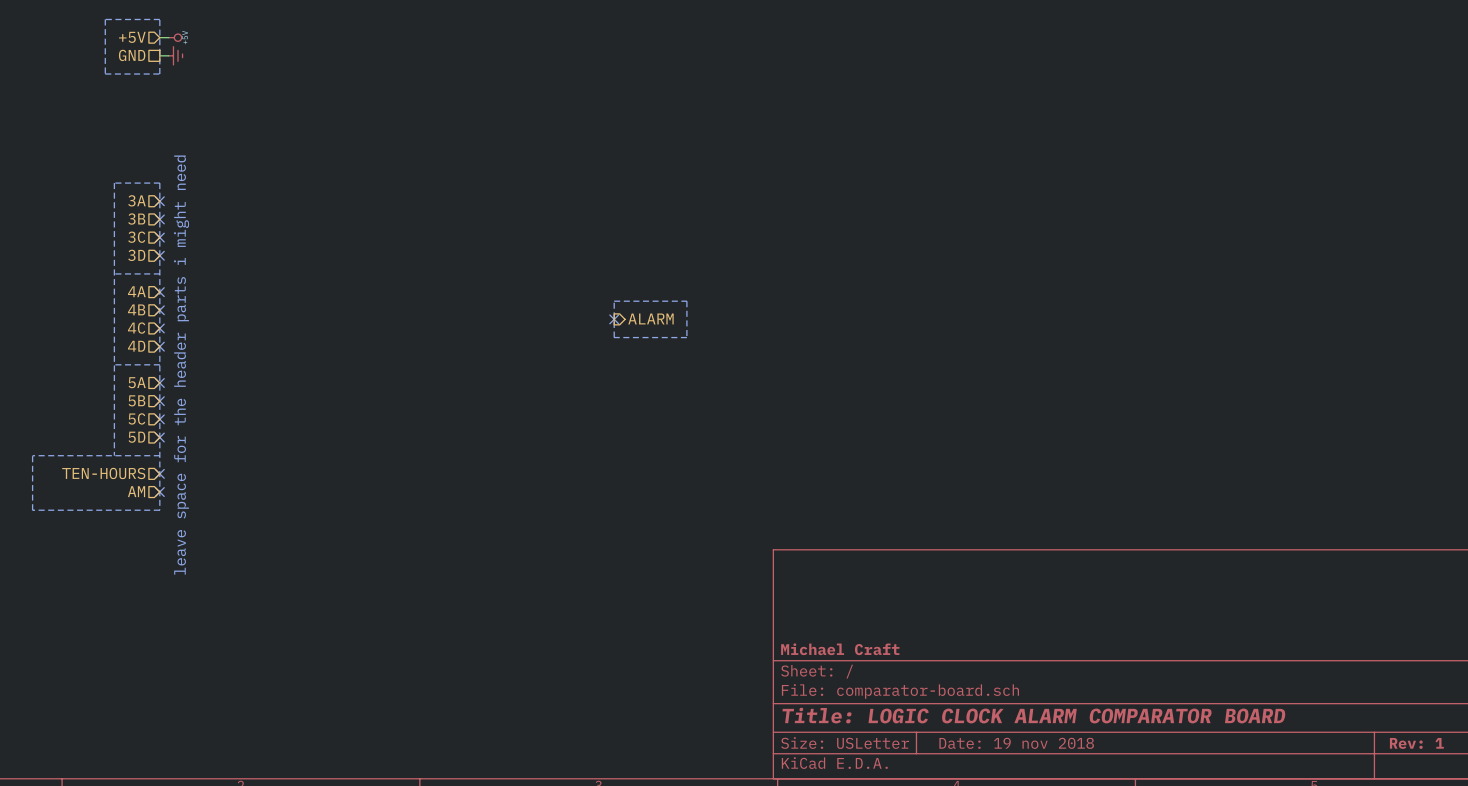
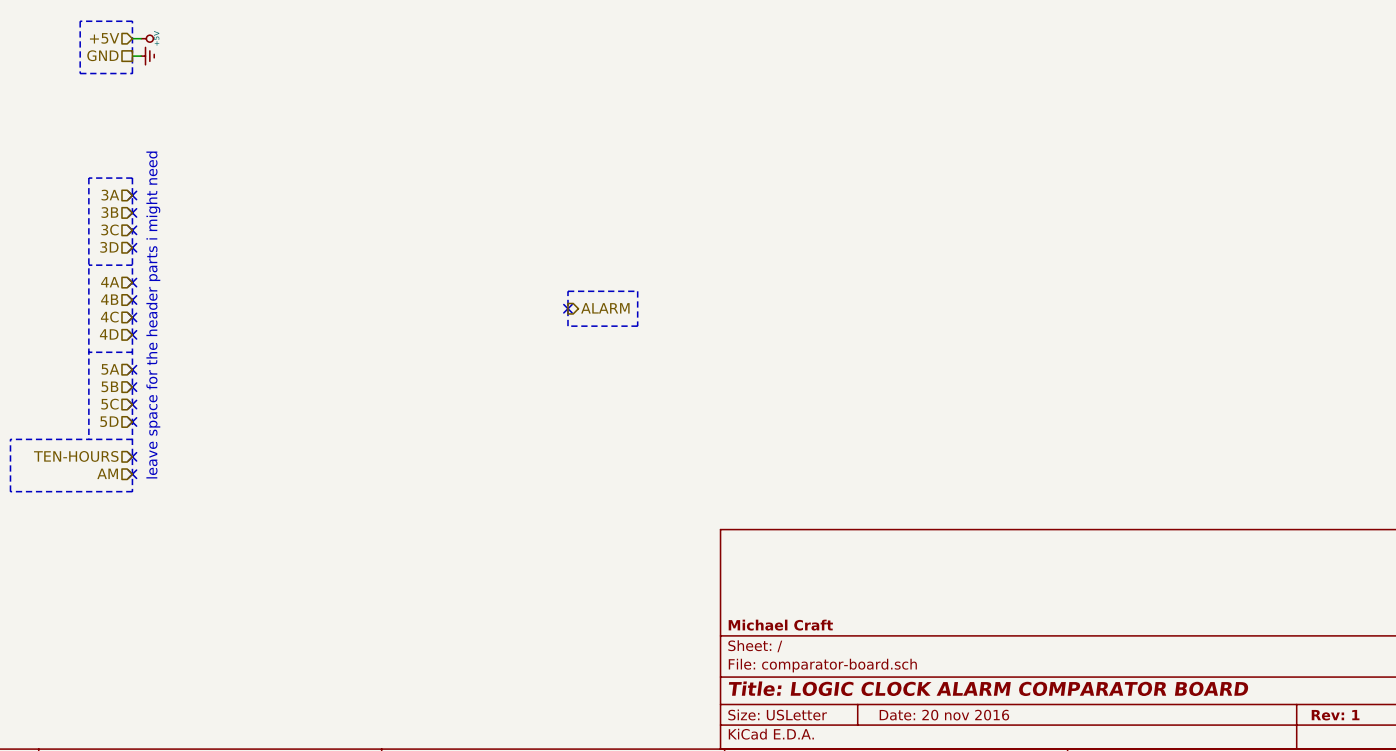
title block: Date: 19 nov 2018 (1016, 743) -> Date: 20 nov 2016 (944, 715)

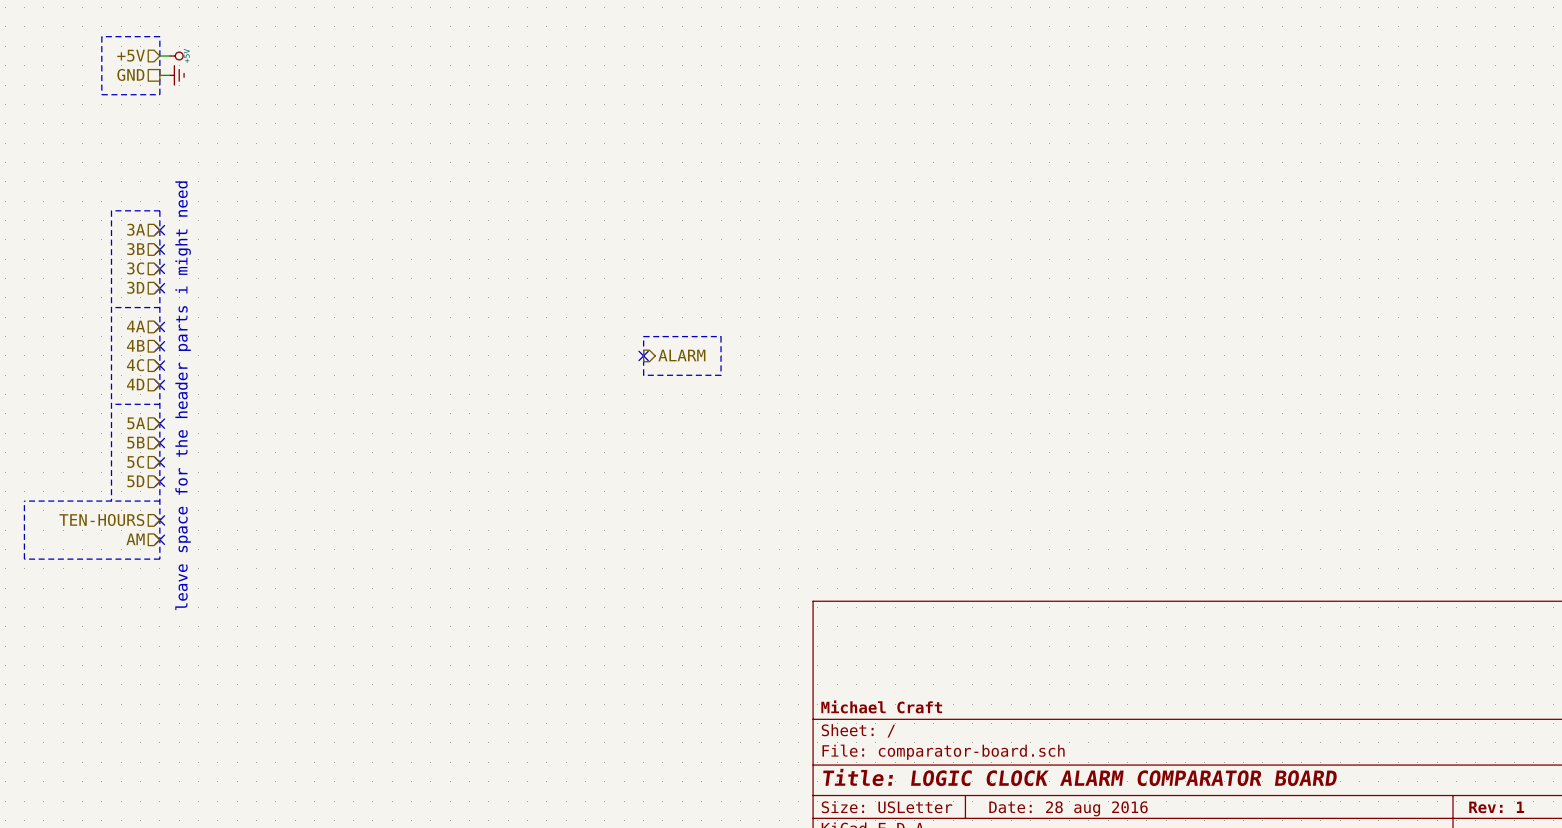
title block: Date: 20 nov 2016 (944, 715) -> Date: 28 aug 2016 (1068, 808)

